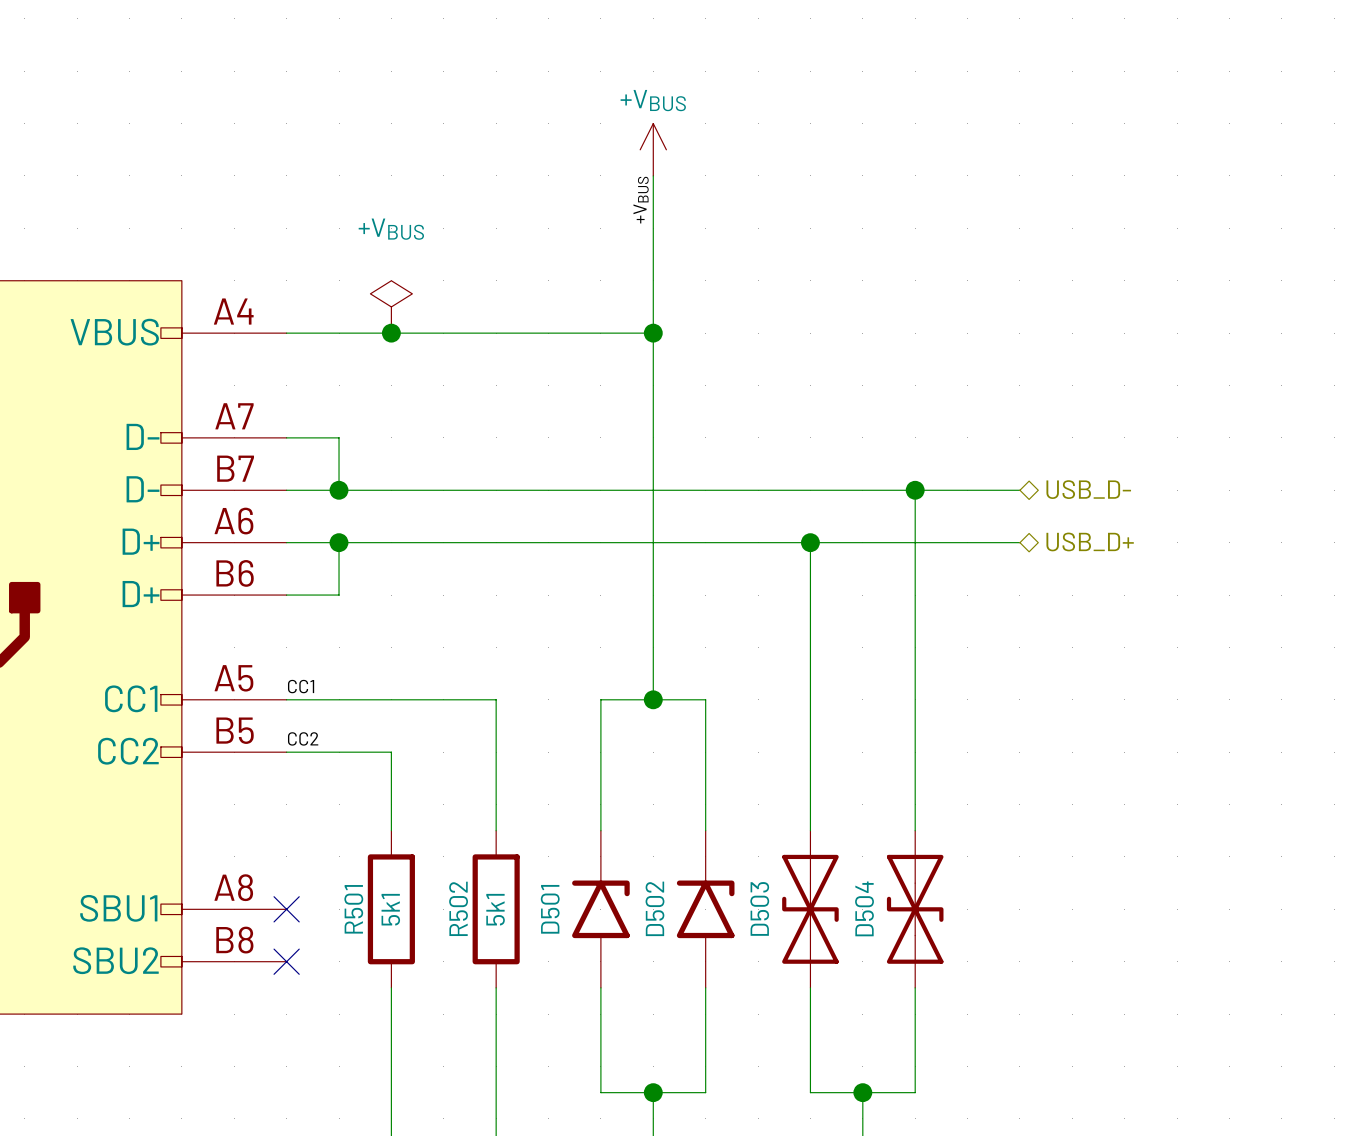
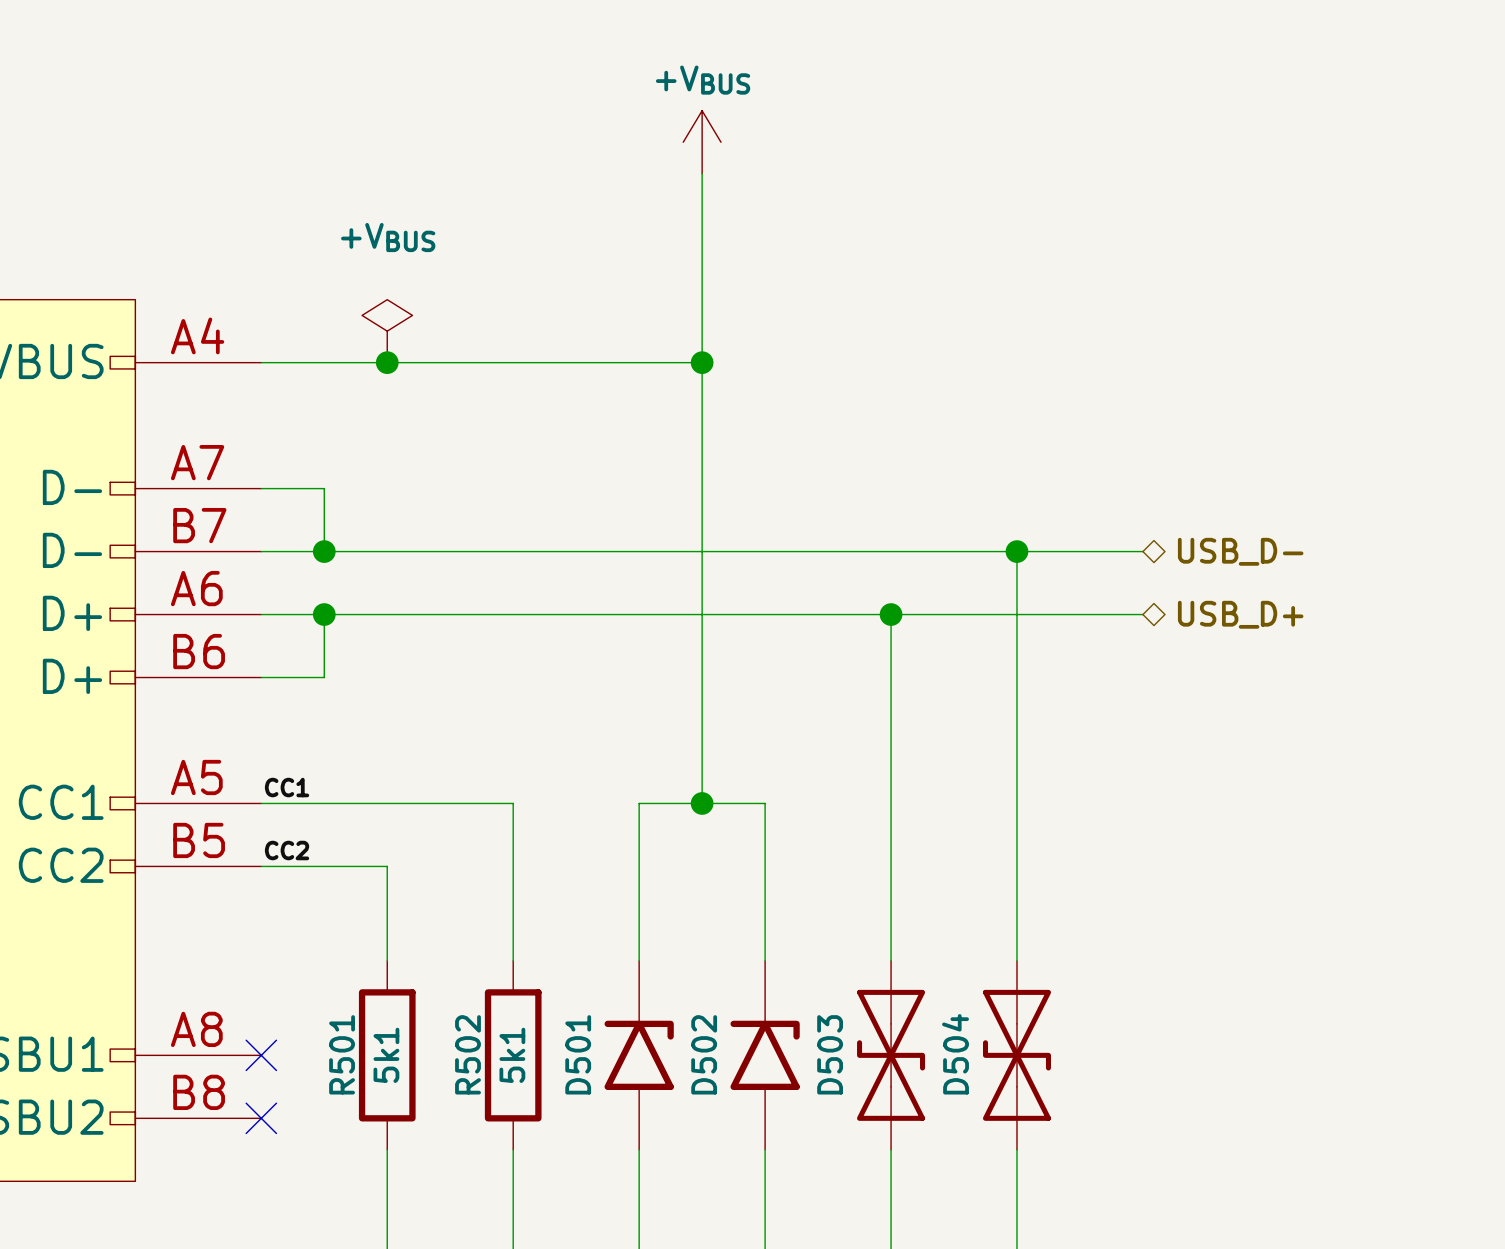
part: +VBUS (653, 149) -> none
power symbol: none -> +VBUS (702, 142)
label: +VBUS (641, 200) -> none

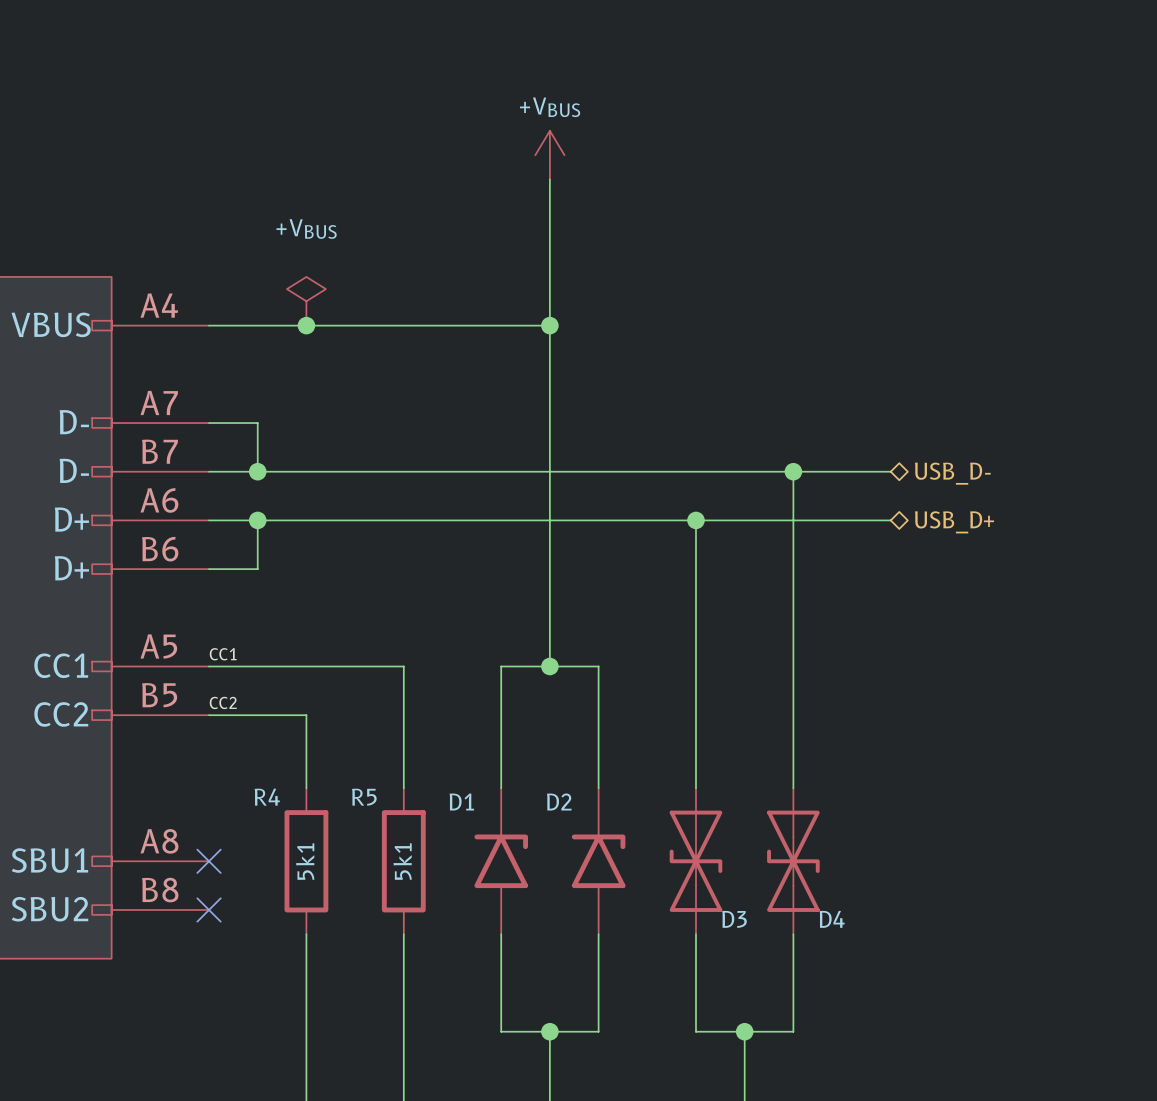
R501 name: R501 (342, 1054) -> R4 (267, 797)
R502 name: R502 (468, 1054) -> R5 (364, 797)
D501 name: D501 (578, 1054) -> D1 (461, 801)
D502 name: D502 (704, 1054) -> D2 (559, 802)
D503 name: D503 (830, 1054) -> D3 (734, 919)
D504 name: D504 (955, 1054) -> D4 (832, 919)

